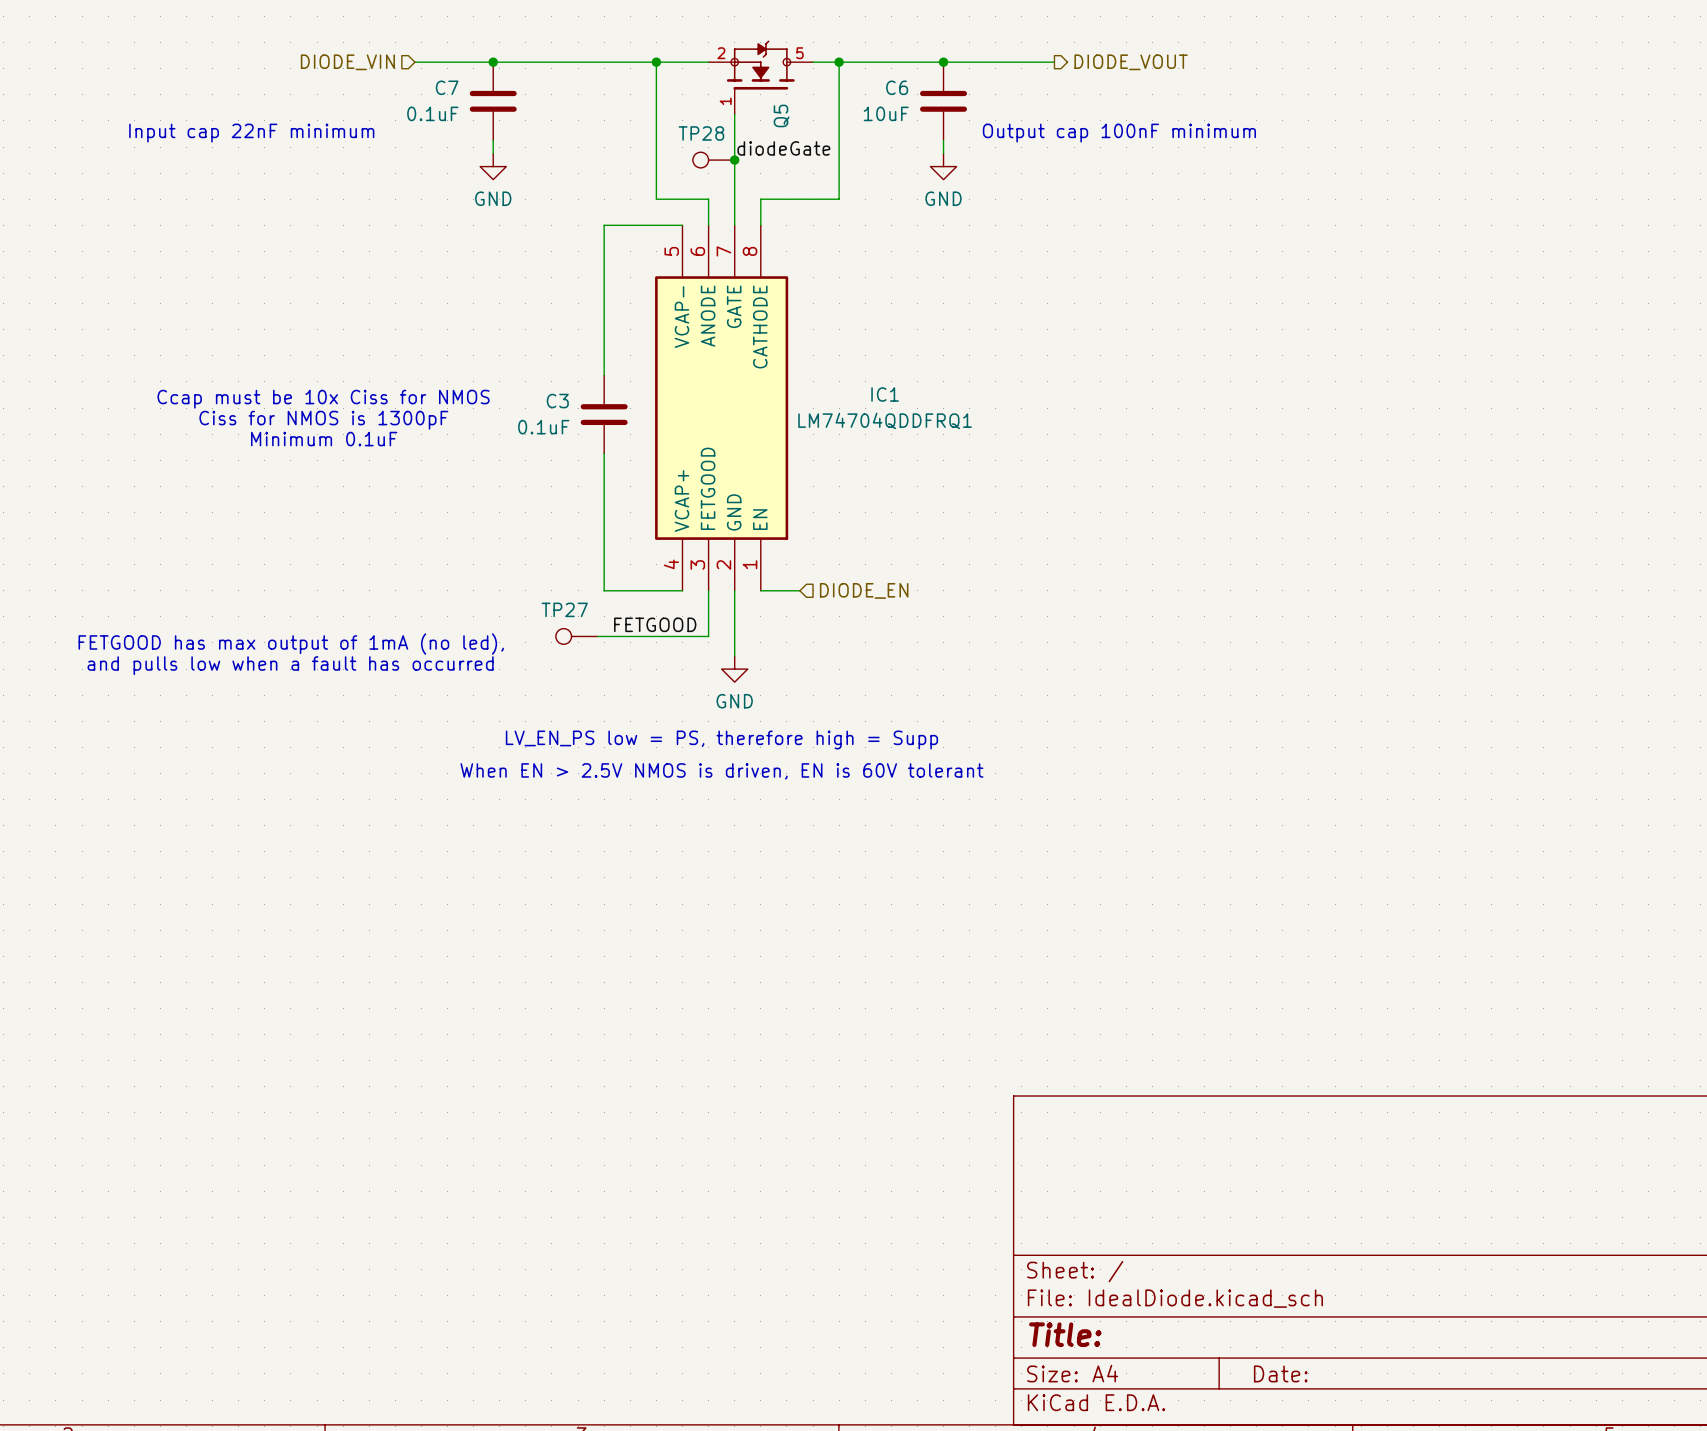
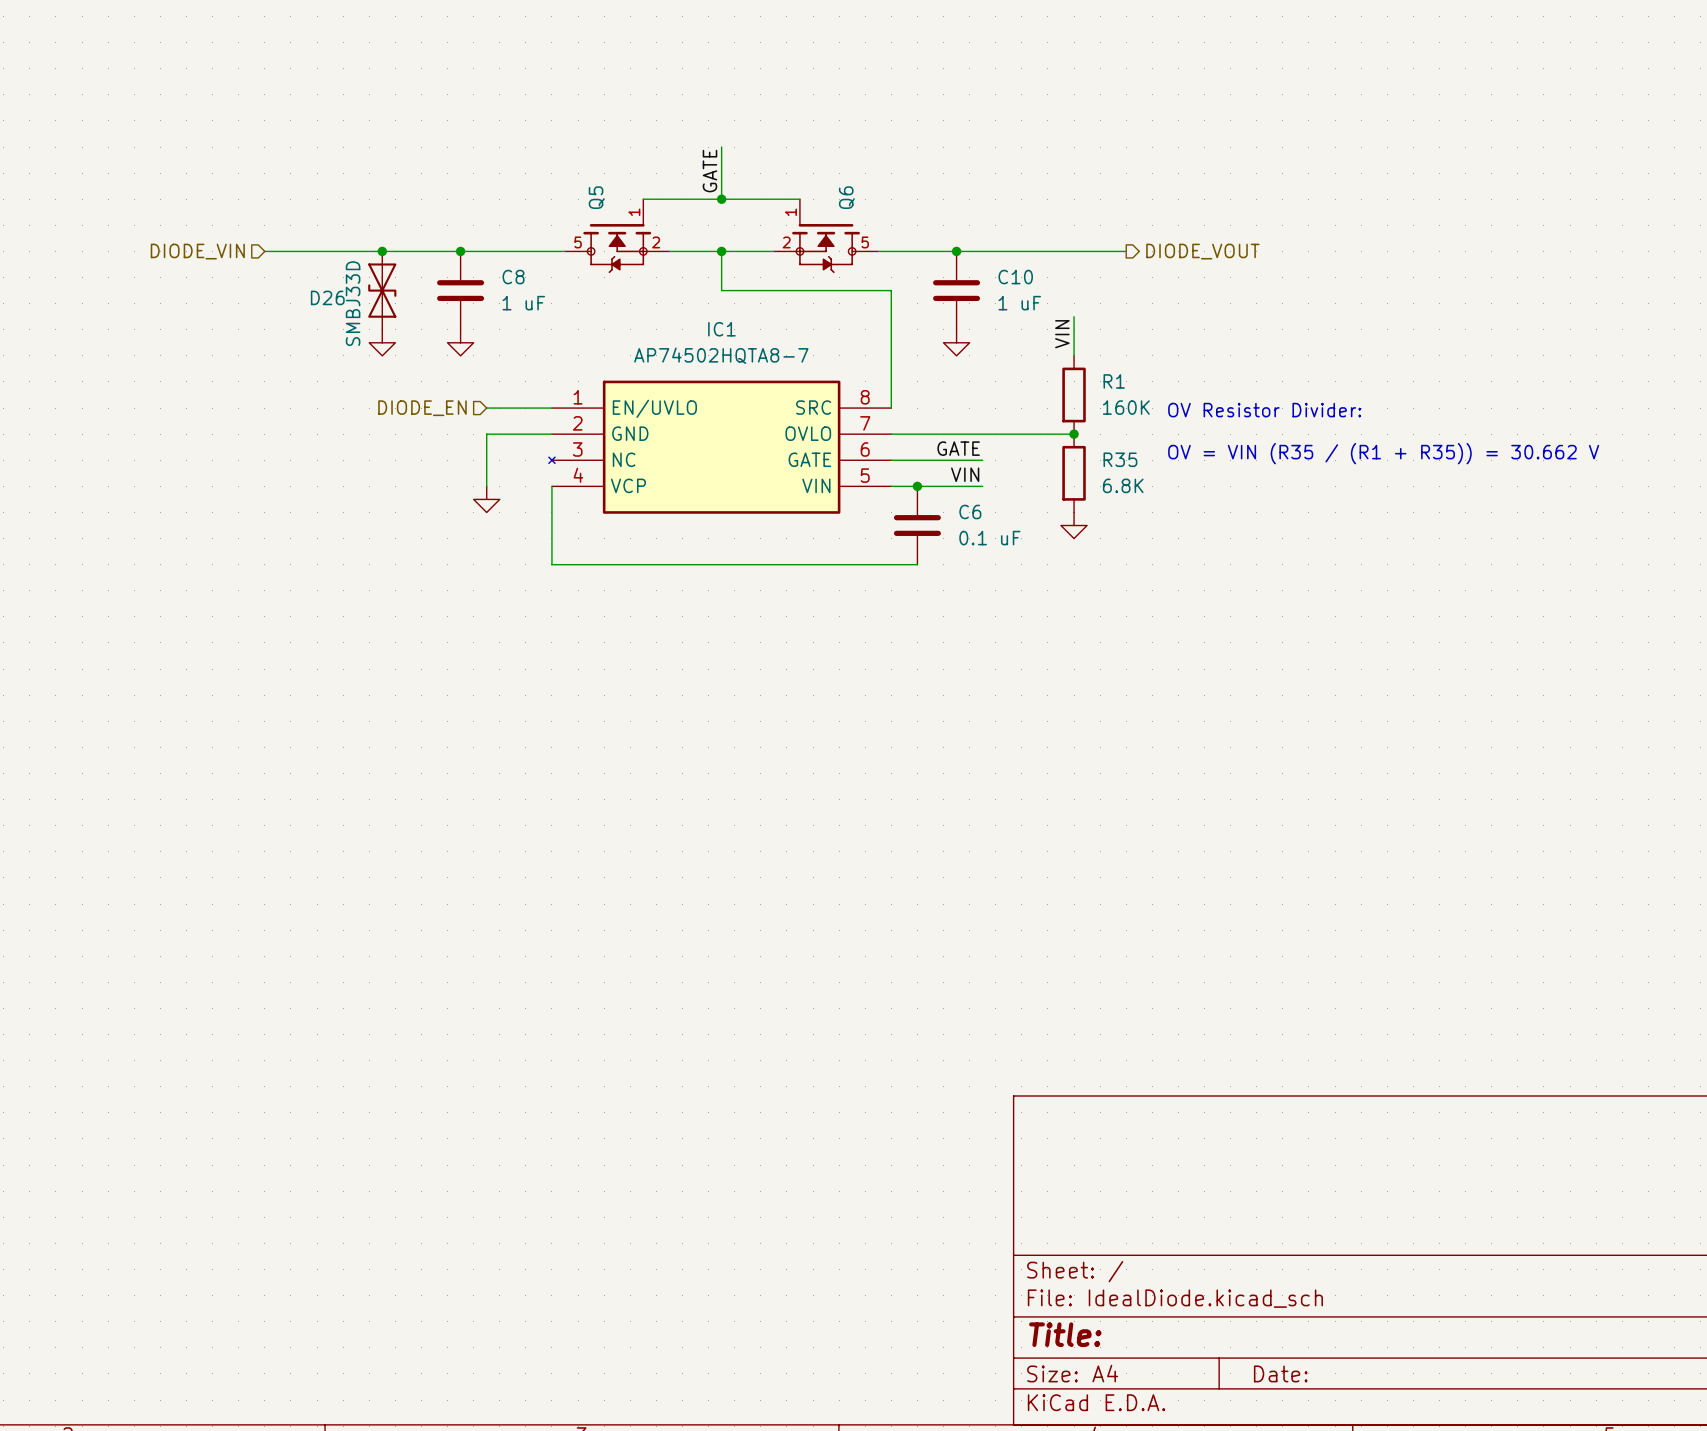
hierarchical label position: DIODE_VIN (347, 62) -> DIODE_VIN (197, 251)
wire: (414, 62) (708, 62) -> none
junction: (493, 62) -> none
wire: (656, 62) (656, 199) -> (643, 199) (656, 199)
junction: (656, 62) -> none
wire: (813, 62) (1054, 62) -> none
wire: (839, 62) (839, 199) (799, 199) -> none
junction: (839, 62) -> none
junction: (943, 62) -> none
hierarchical label position: DIODE_VOUT (1131, 62) -> DIODE_VOUT (1202, 251)
Q5 rotation: 0° (760, 65) -> 180° (617, 248)
Q5 position: (760, 77) -> (617, 236)
C6 name position: C6 (897, 87) -> C6 (970, 511)
C7: 0.1uF (493, 101) -> none
C6 position: (943, 101) -> (917, 525)
C6 value: 10uF (886, 113) -> 0.1 uF (989, 538)
wire: (734, 114) (734, 225) -> none
text: Input cap 22nF minimum (251, 133) -> none
text: Output cap 100nF minimum (1119, 133) -> none
wire: (493, 140) (493, 153) -> none
wire: (943, 140) (943, 153) -> none
wire: none -> (721, 147) (721, 199)
label: diodeGate (783, 148) -> none
TP28: (713, 160) -> none
junction position: (734, 160) -> (721, 199)
power symbol: GND (493, 166) -> none
power symbol: GND (943, 166) -> none
label: none -> GATE (709, 171)
wire: (708, 199) (708, 225) -> (708, 199) (760, 199)
wire: (760, 199) (760, 225) -> none
IC1 symbol: [655, 225, 789, 591] -> [548, 380, 892, 514]
wire: (682, 225) (604, 225) (604, 375) -> none
Q6: none -> (826, 236)
wire: none -> (264, 251) (565, 251)
junction: none -> (382, 251)
junction: none -> (460, 251)
wire: none -> (669, 251) (773, 251)
wire: none -> (721, 251) (721, 290) (891, 290) (891, 408)
junction: none -> (721, 251)
wire: none -> (878, 251) (1126, 251)
junction: none -> (956, 251)
D26: none -> SMBJ33D (382, 290)
C8: none -> 1 uF (460, 290)
C10: none -> 1 uF (956, 290)
wire: none -> (1074, 316) (1074, 355)
label: none -> VIN (1062, 334)
power symbol: none -> (382, 342)
power symbol: none -> (460, 342)
power symbol: none -> (956, 342)
IC1 name position: IC1 (885, 394) -> IC1 (721, 329)
R1: none -> 160K (1074, 395)
text: Ccap must be 10x Ciss for NMOS (323, 399) -> none
hierarchical label: none -> DIODE_EN (422, 408)
wire: none -> (486, 408) (551, 408)
text: none -> OV Resistor Divider: (1264, 410)
C3: 0.1uF (604, 414) -> none
text: Ciss for NMOS is 1300pF (323, 420) -> none
IC1 value: LM74704QDDFRQ1 (885, 420) -> AP74502HQTA8-7 (721, 355)
wire: none -> (551, 434) (486, 434) (486, 486)
wire: none -> (891, 434) (1074, 434)
junction: none -> (1074, 434)
text: Minimum 0.1uF (324, 439) -> none
label: none -> GATE (958, 448)
wire: (604, 453) (604, 590) (682, 590) -> none
text: none -> OV = VIN (R35 / (R1 + R35)) = 30.662 V (1383, 453)
wire: none -> (891, 460) (982, 460)
R35: none -> 6.8K (1074, 473)
label: none -> VIN (965, 474)
wire: none -> (551, 486) (551, 564) (917, 564)
wire: none -> (891, 486) (982, 486)
junction: none -> (917, 486)
power symbol: none -> (486, 499)
power symbol: none -> (1074, 525)
wire: (708, 590) (708, 636) (597, 636) -> none
wire: (734, 590) (734, 656) -> none
wire: (760, 590) (799, 590) -> none
hierarchical label: DIODE_EN (864, 590) -> none
label: FETGOOD (655, 624) -> none
TP27: (576, 636) -> none
text: FETGOOD has max output of 1mA (no led), (291, 644) -> none
text: and pulls low when a fault has occurred (290, 665) -> none
power symbol: GND (734, 669) -> none
text: LV_EN_PS low = PS, therefore high = Supp (721, 739) -> none
text: When EN > 2.5V NMOS is driven, EN is 60V tolerant (721, 771) -> none

